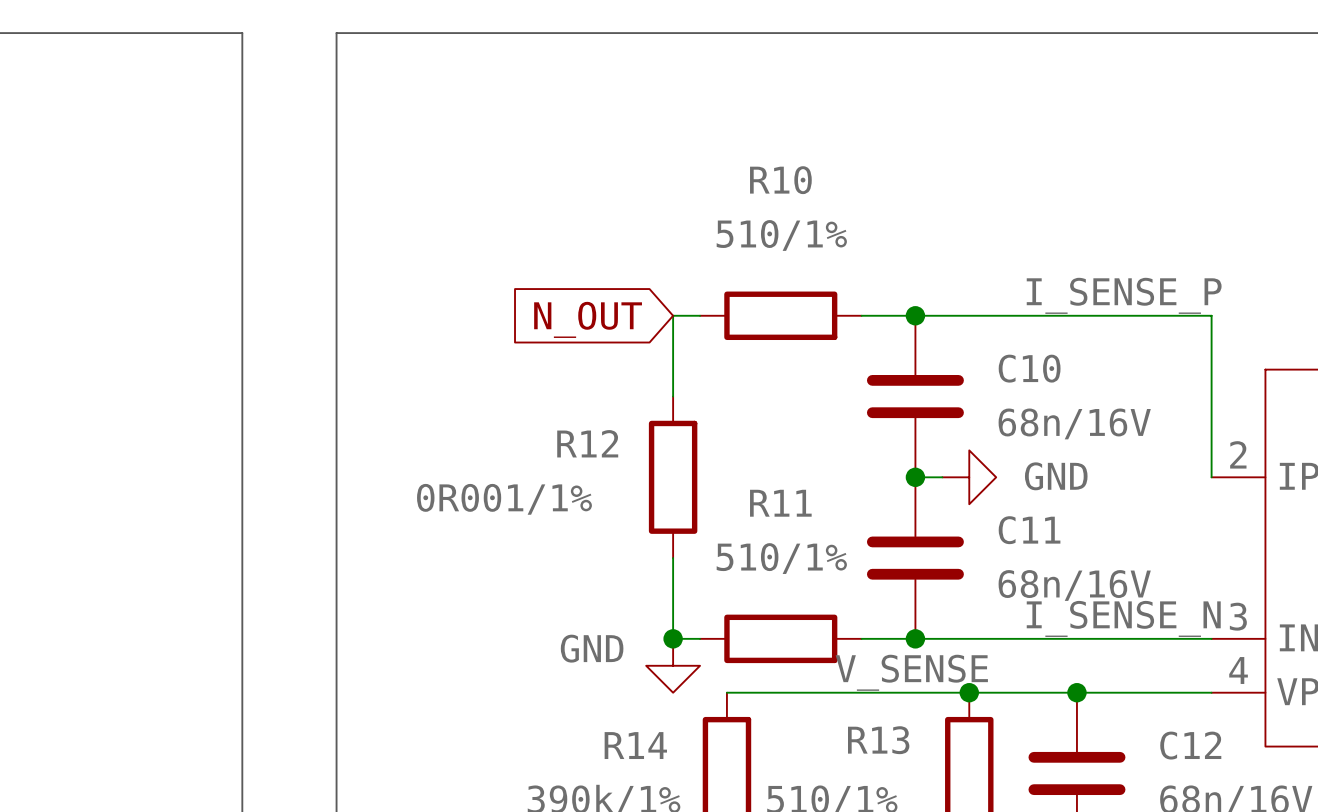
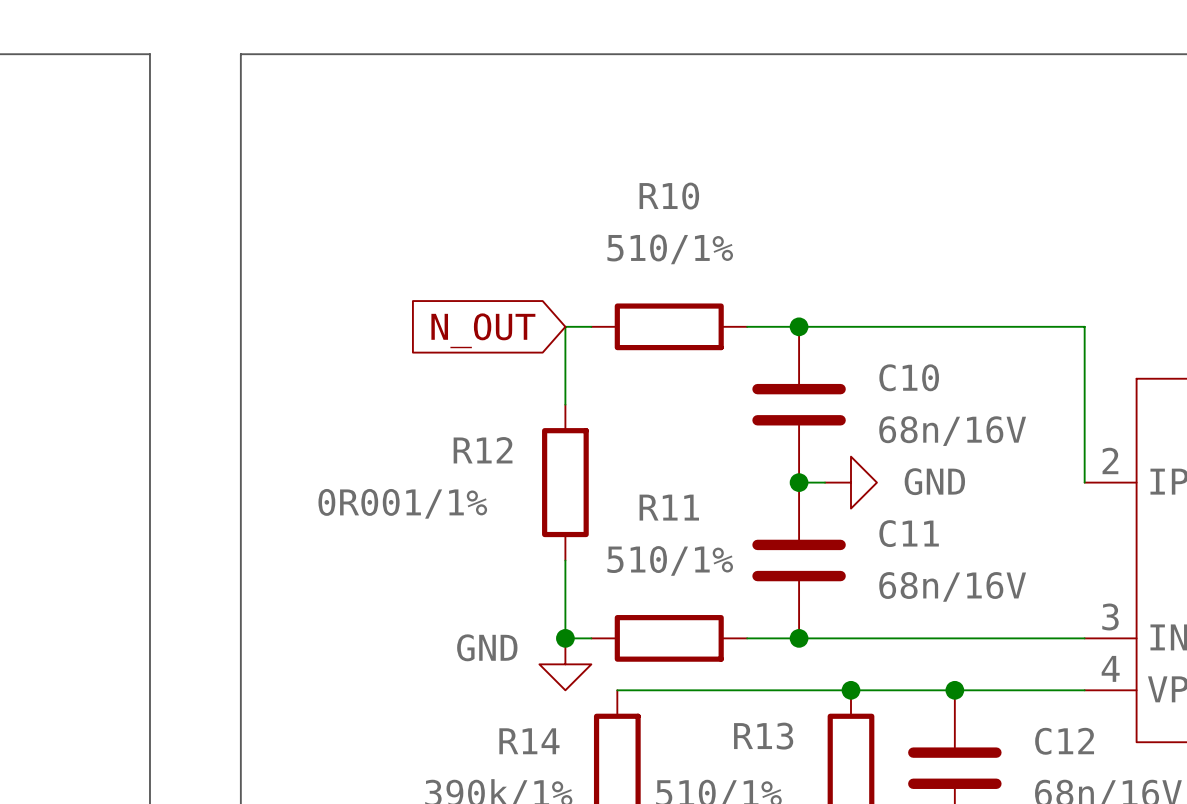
label: I_SENSE_P (1124, 295) -> none
label: I_SENSE_N (1123, 618) -> none
label: V_SENSE (911, 672) -> none

